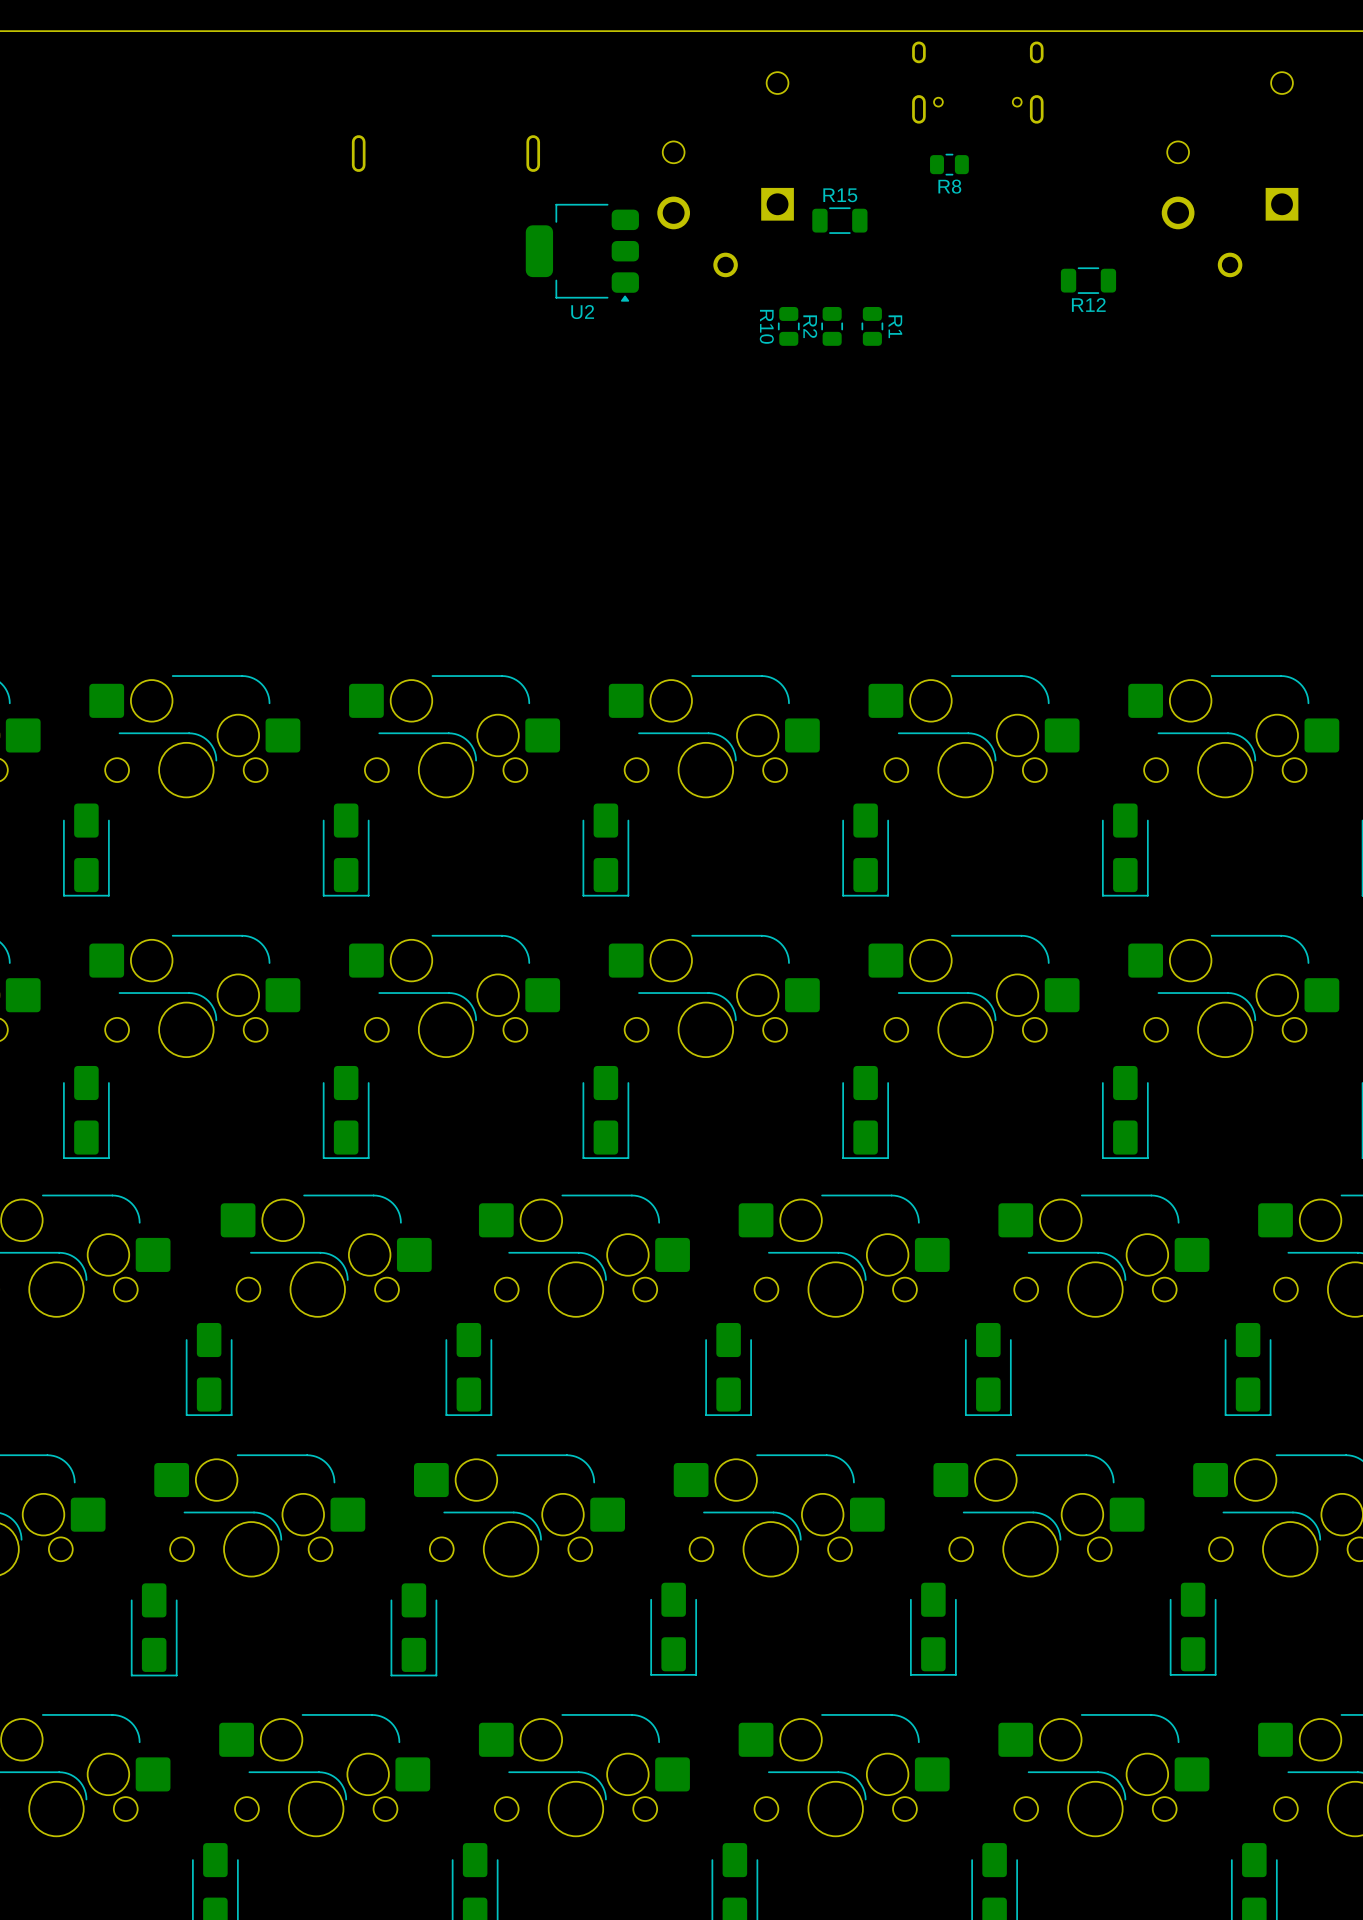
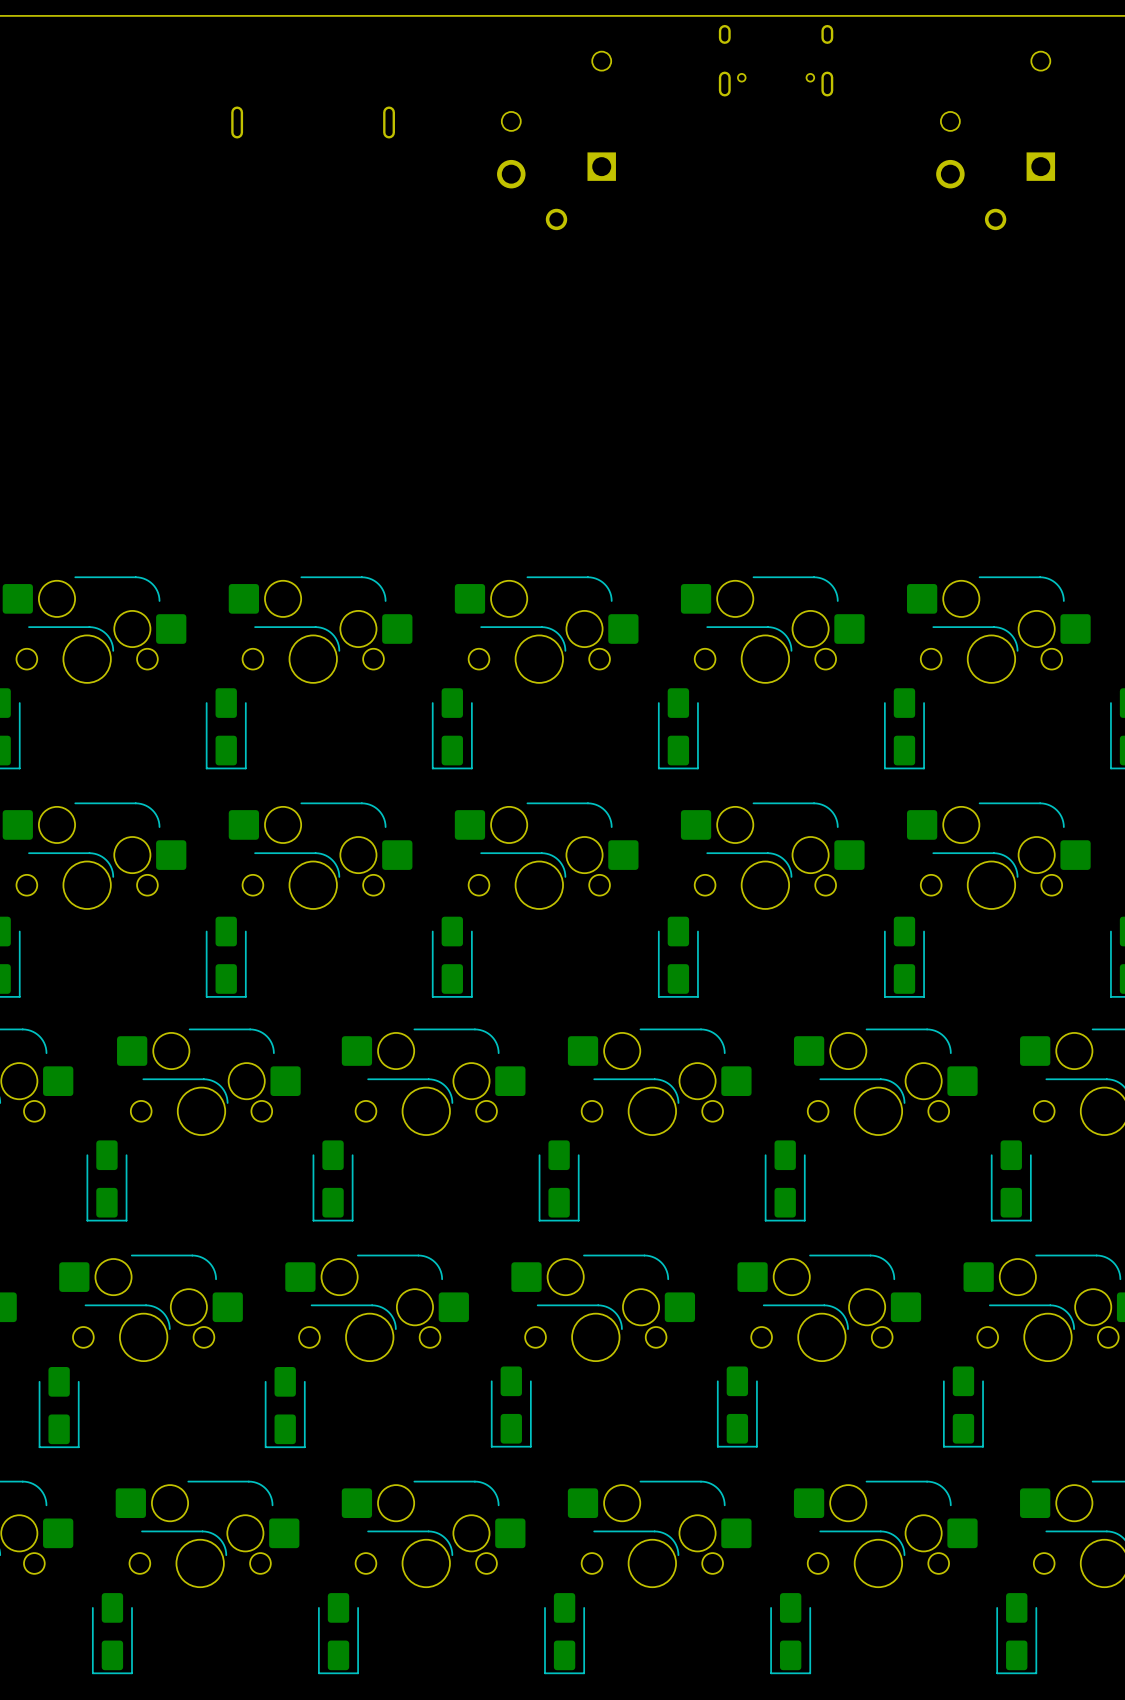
R8: (949, 164) -> none
R15: (839, 220) -> none
U2: (582, 252) -> none
R12: (1088, 280) -> none
R10: (788, 326) -> none
R2: (832, 326) -> none
R1: (872, 326) -> none

